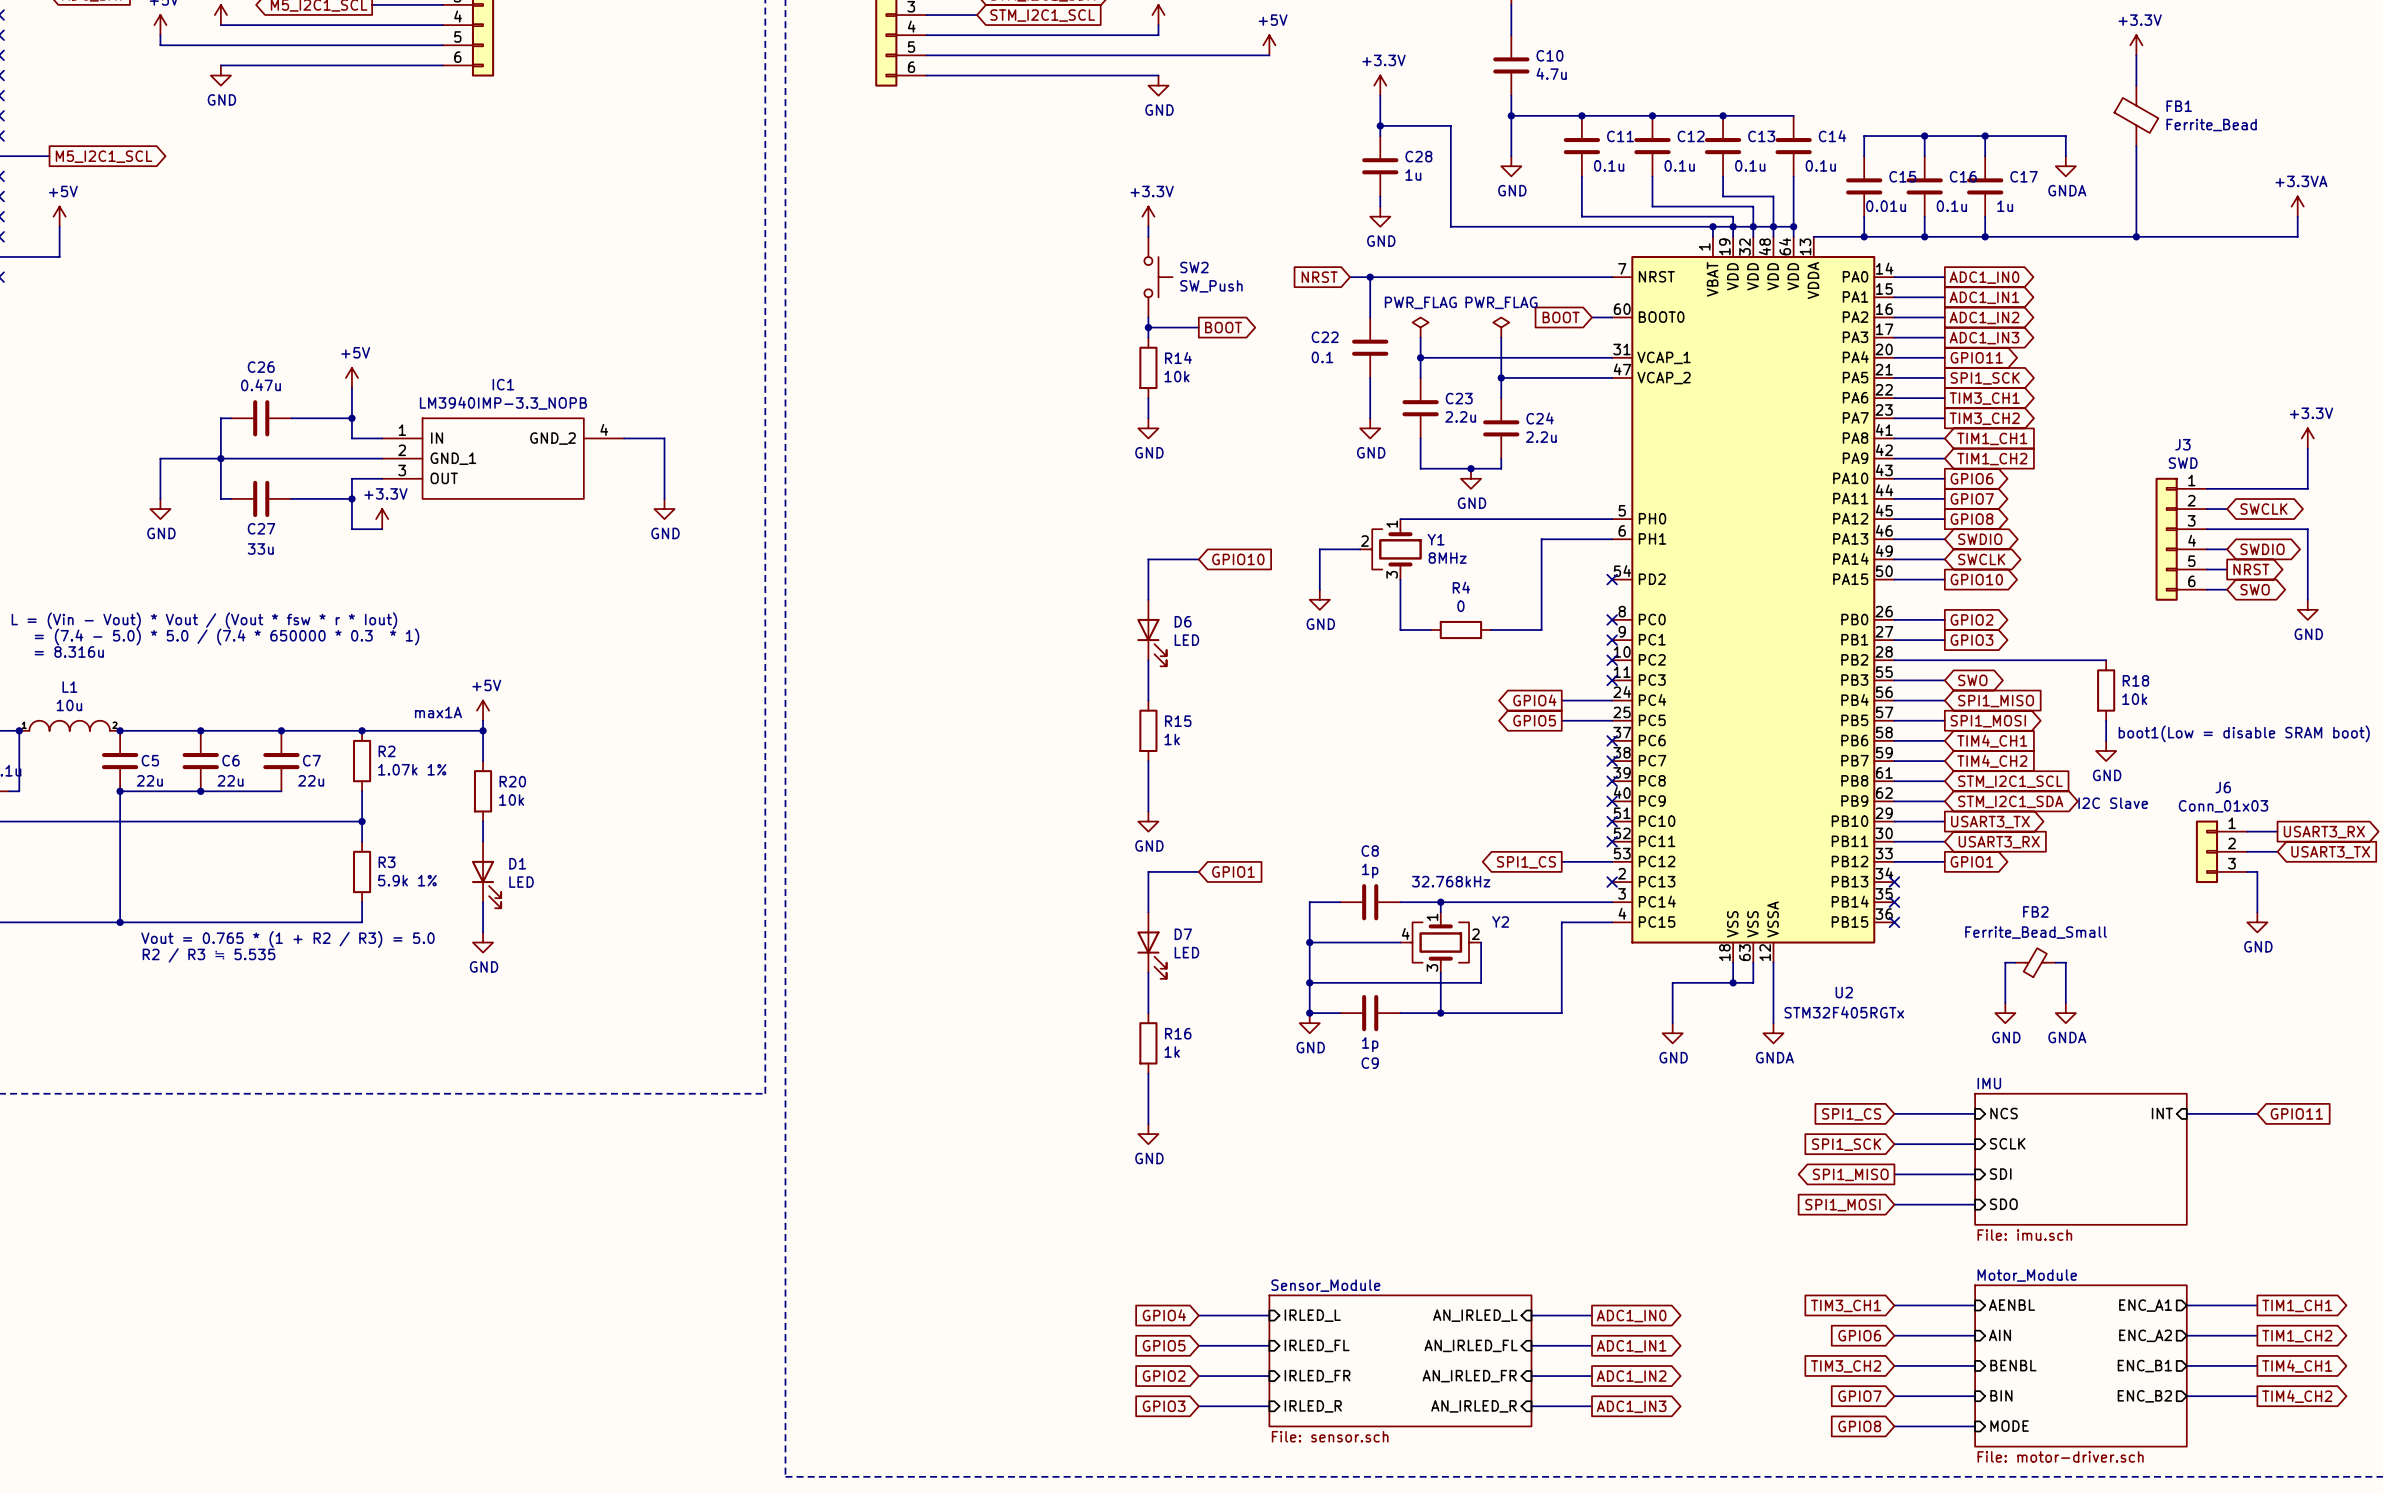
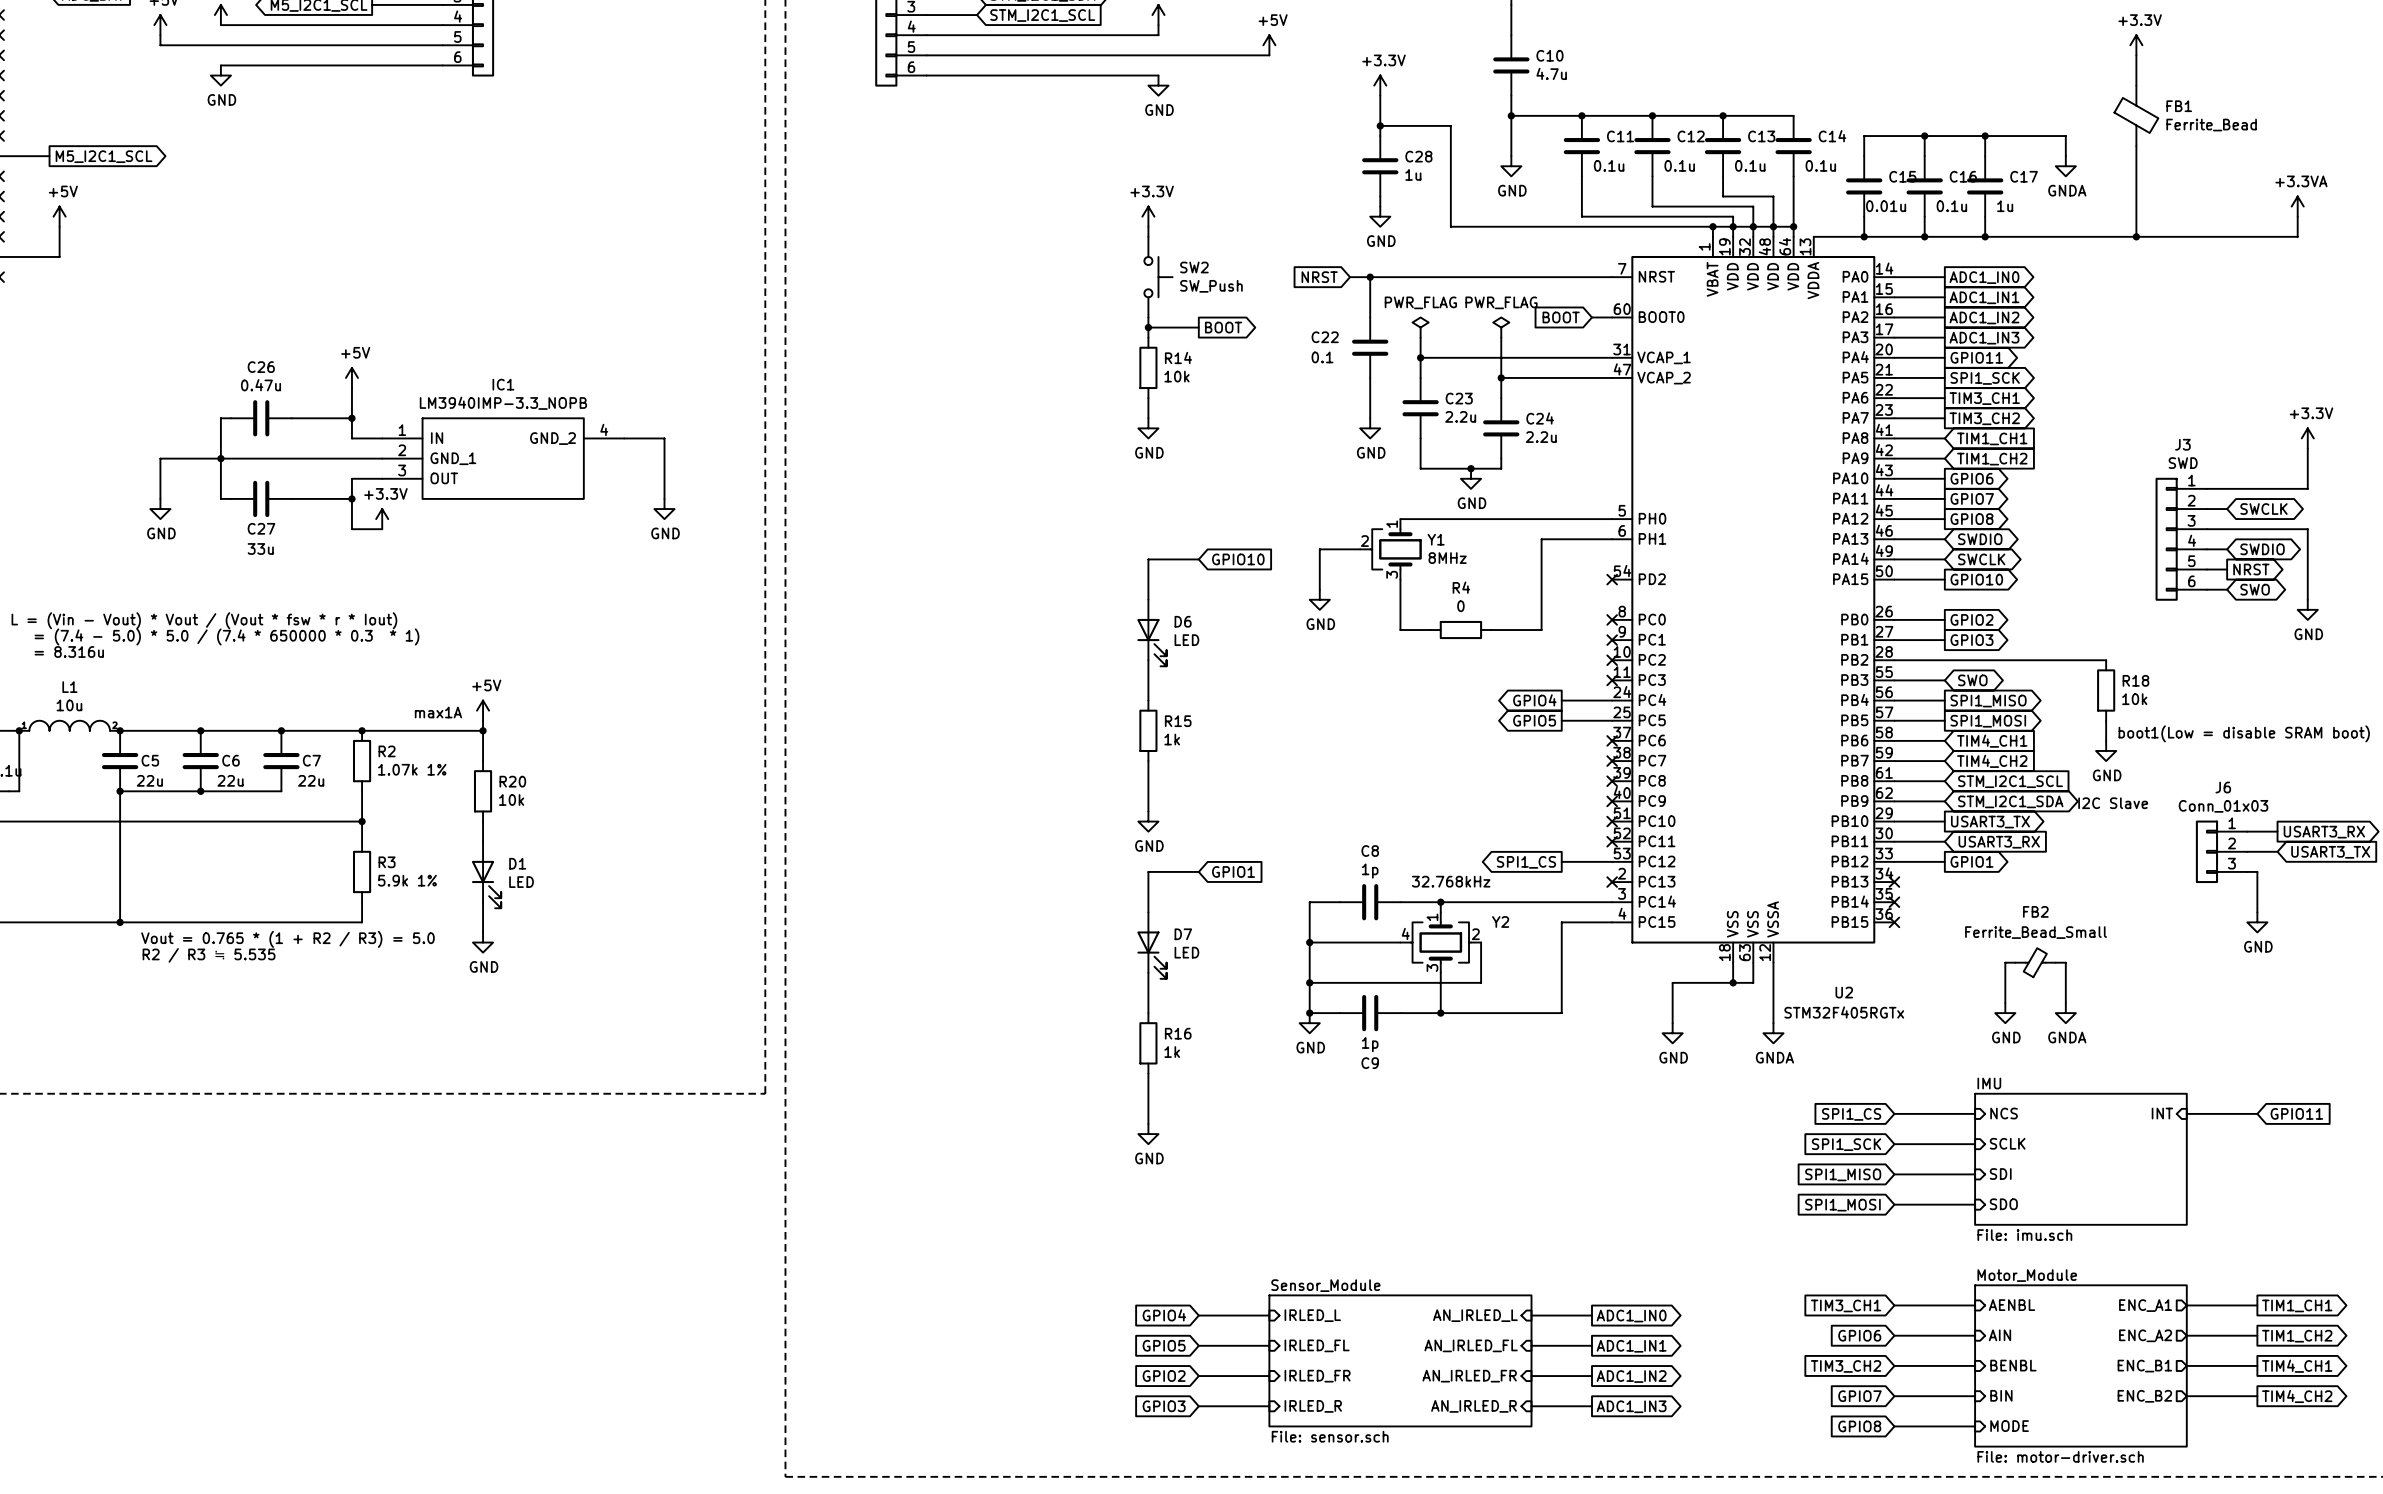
global label shape: input (1996, 701) -> output (1988, 701)
global label shape: output (1850, 1174) -> input (1843, 1174)

